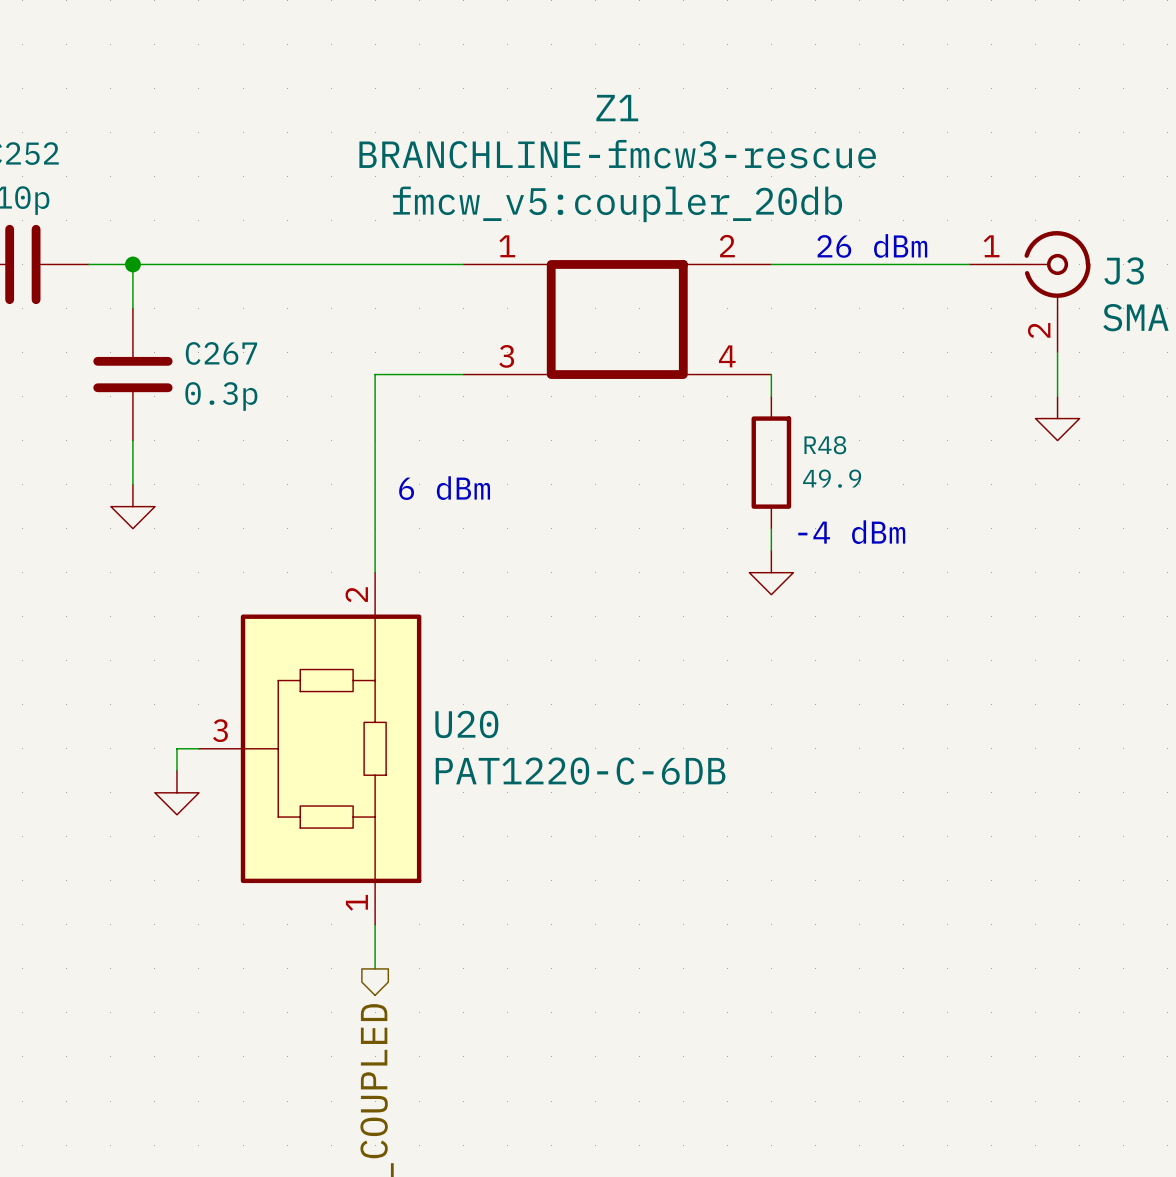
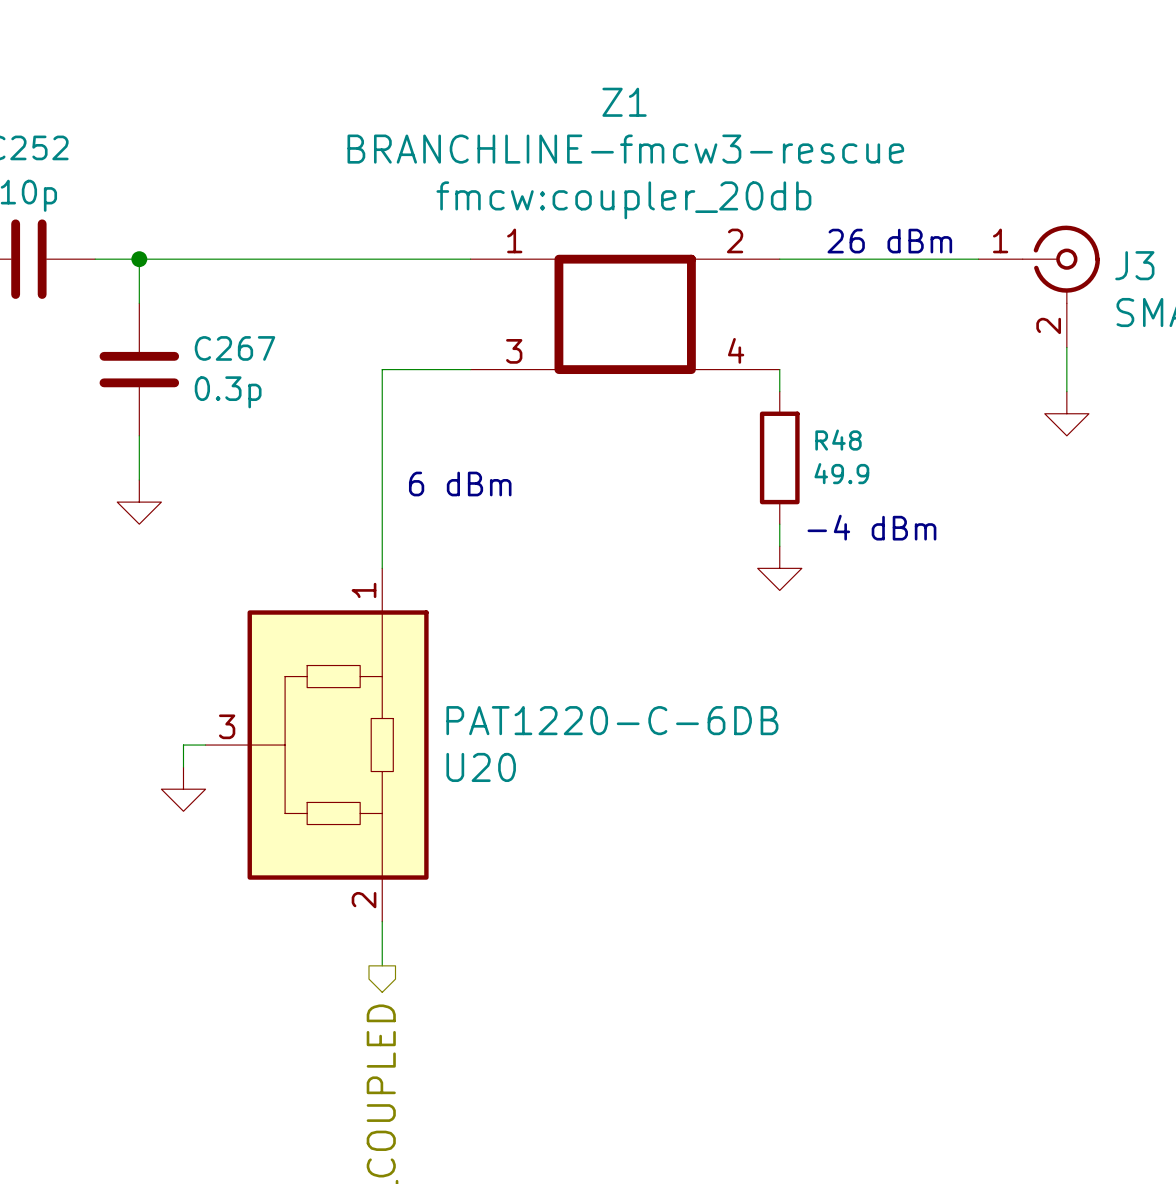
Z1 text: fmcw_v5:coupler_20db (617, 204) -> fmcw:coupler_20db (623, 200)
U20 flip: as is (331, 748) -> up-down (338, 745)

